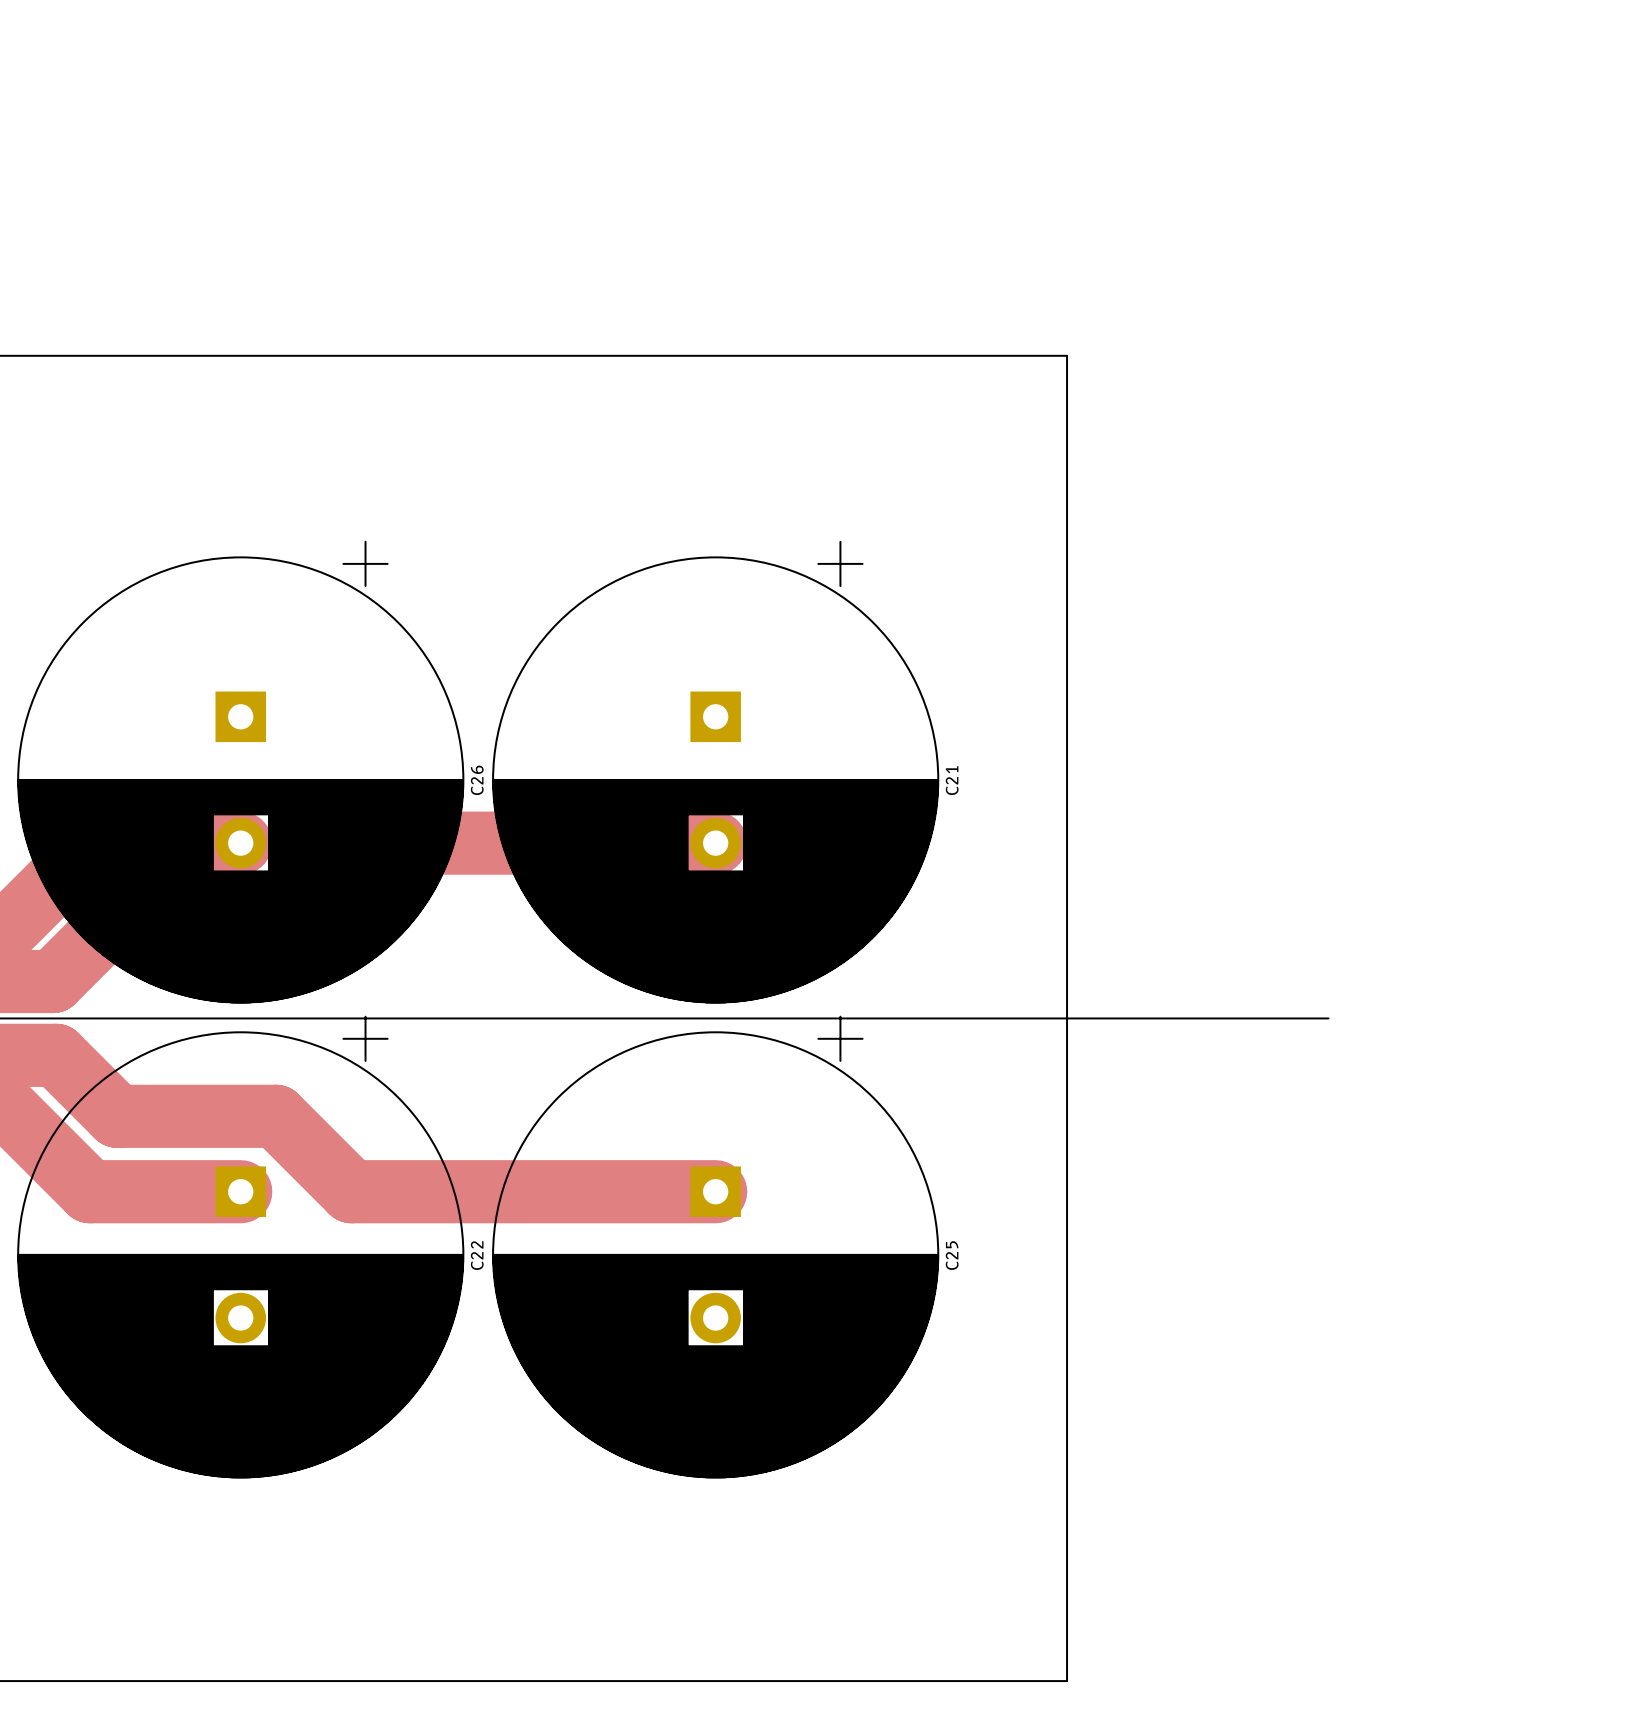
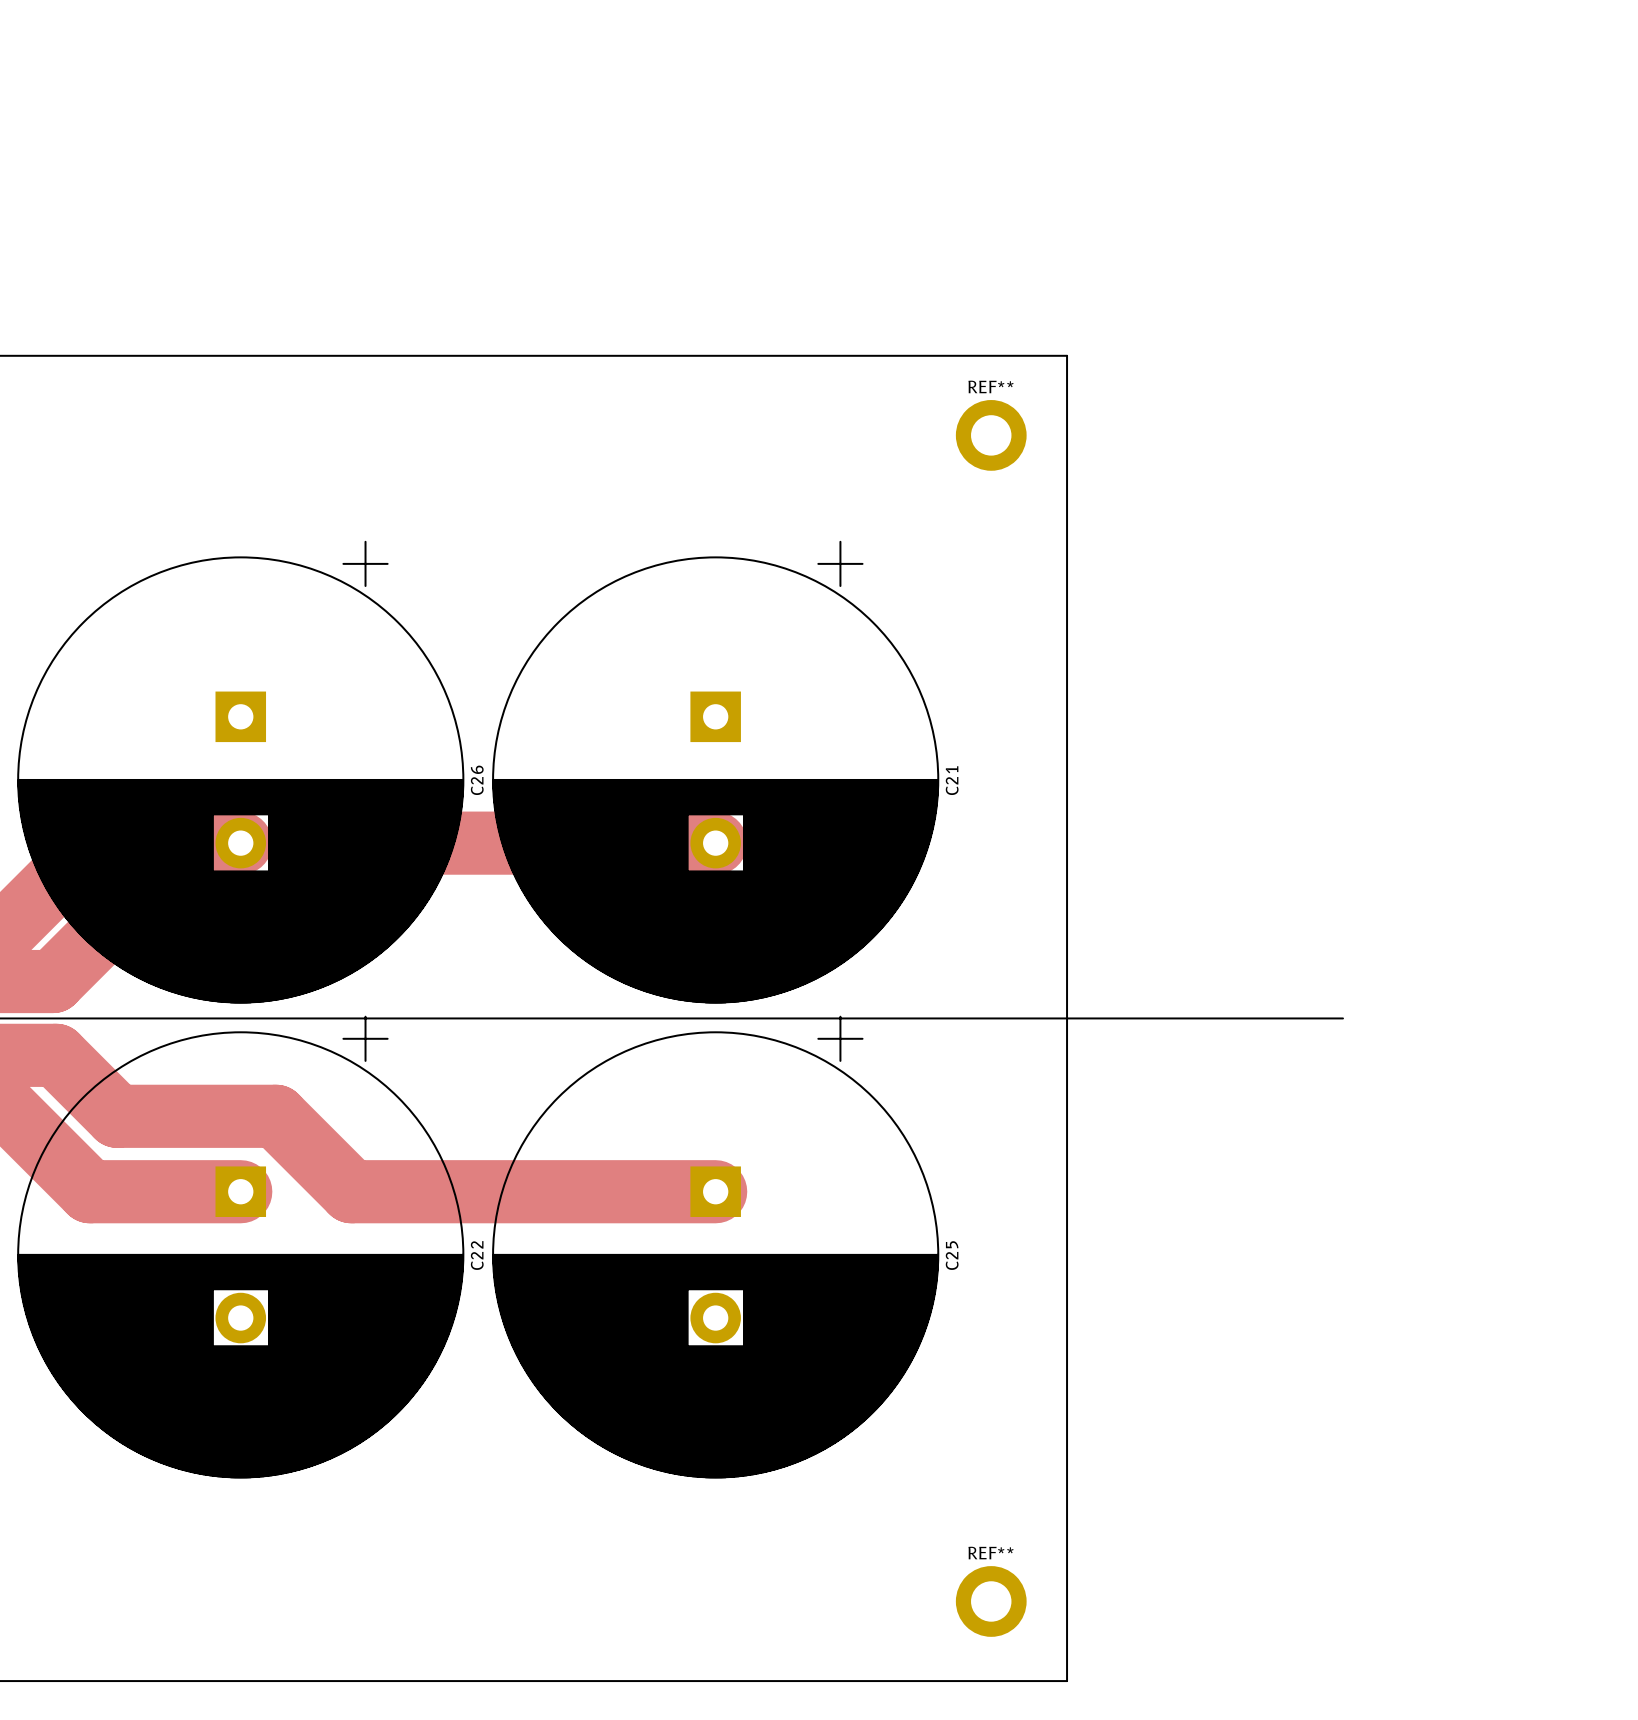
REF**: none -> (991, 435)
line: none -> (1328, 1018) (1343, 1018)
REF**: none -> (991, 1601)

